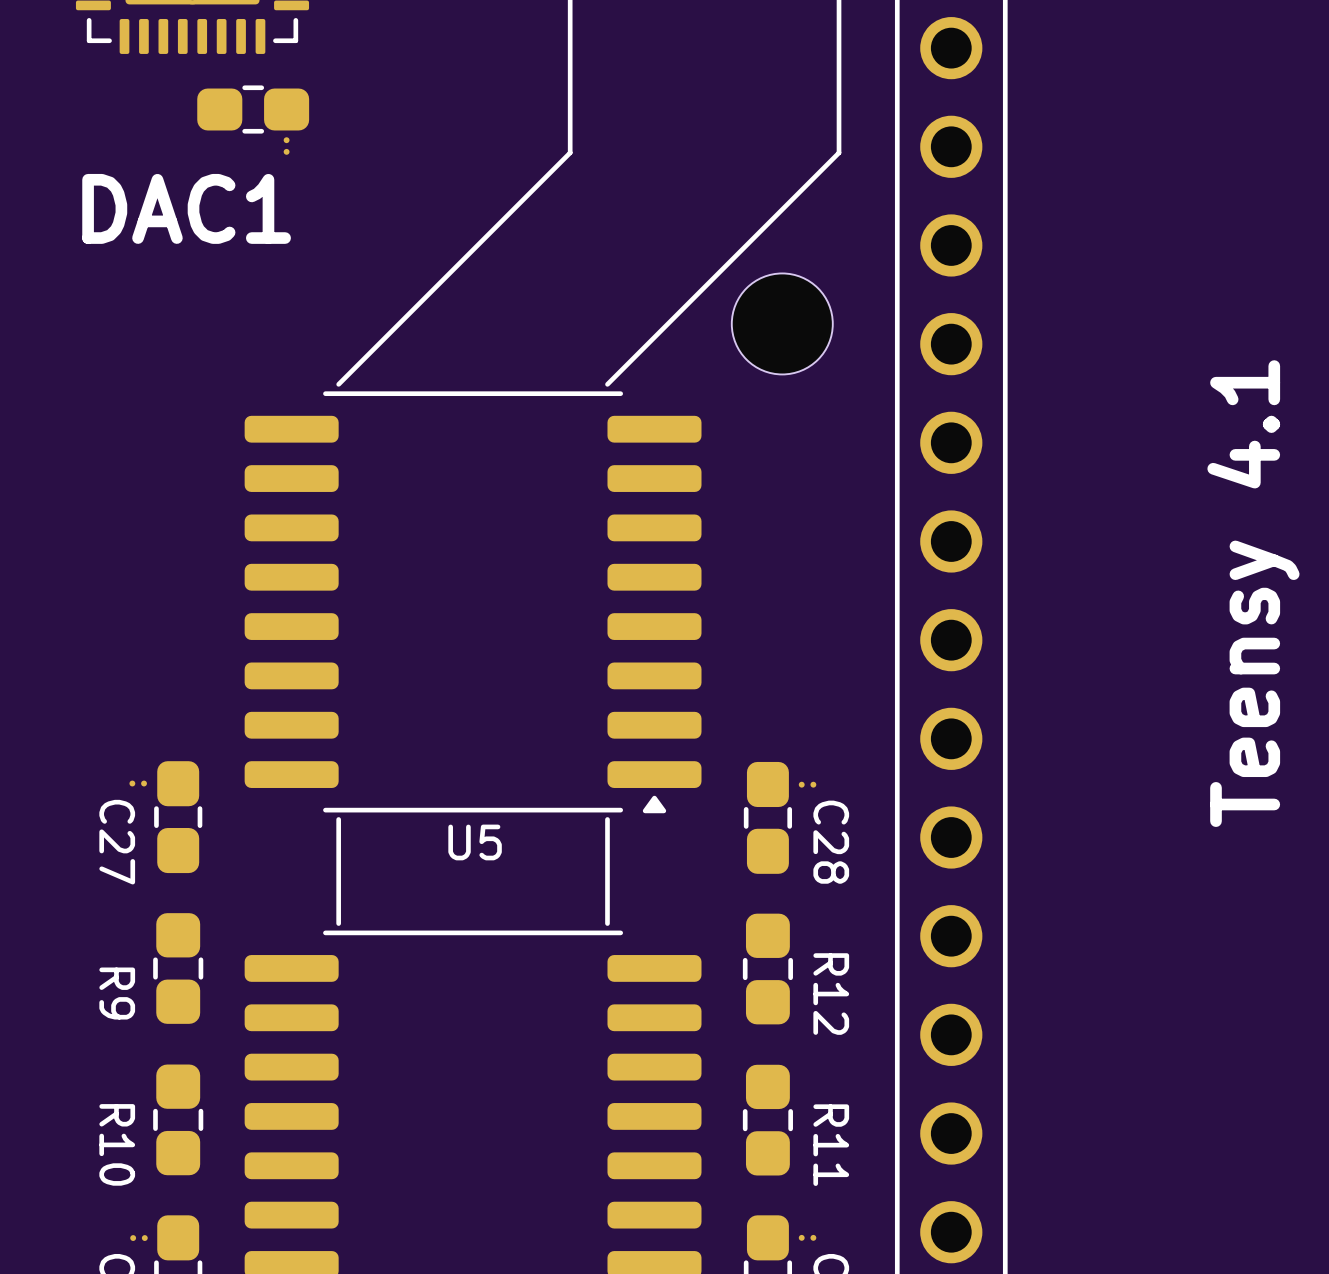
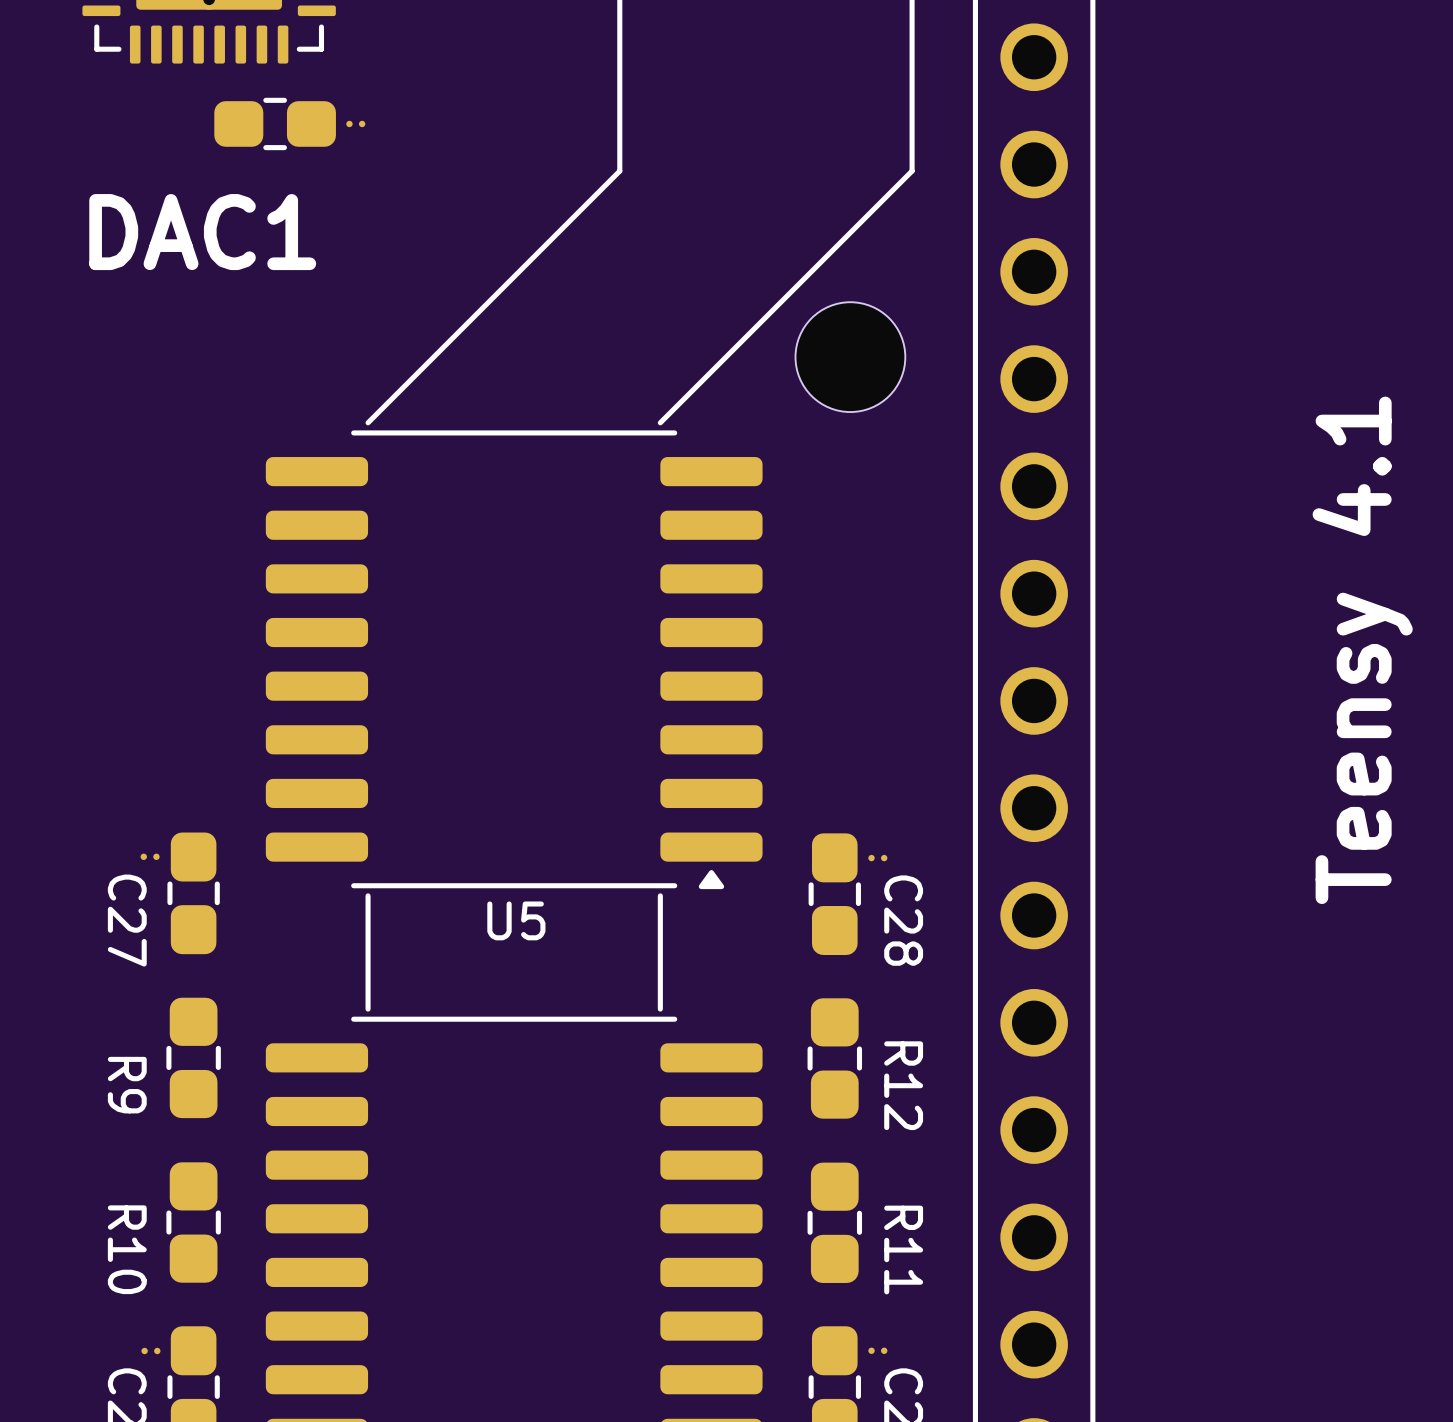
part rotation: 0° (286, 146) -> 90° clockwise (355, 123)
part position: (286, 146) -> (355, 123)

